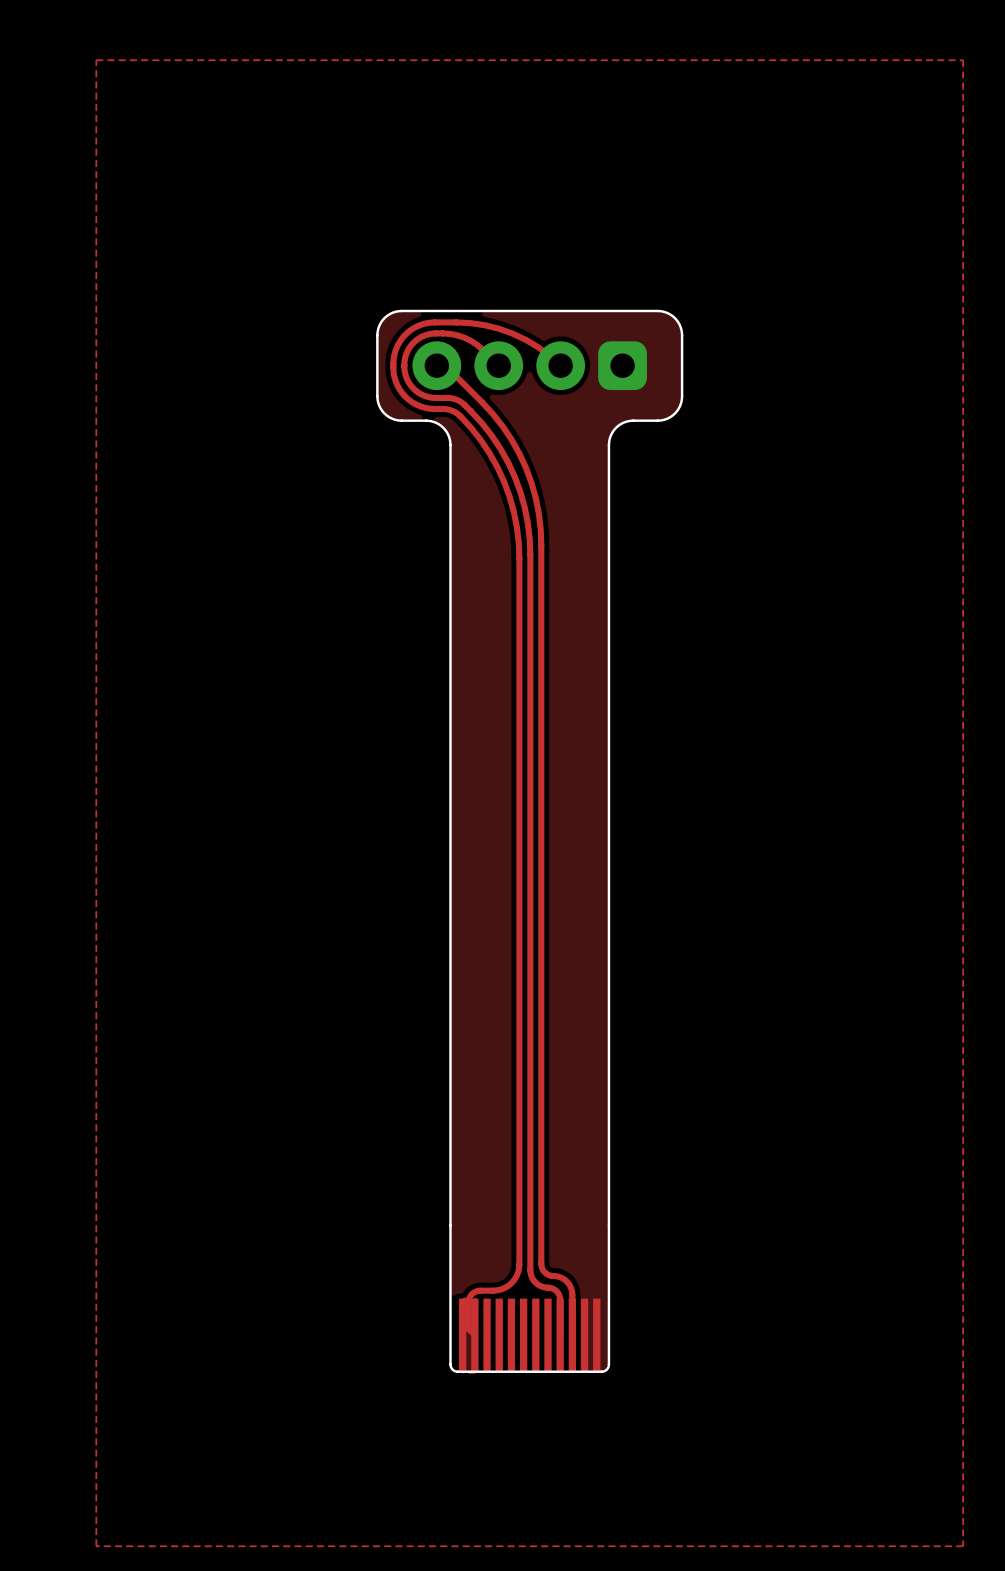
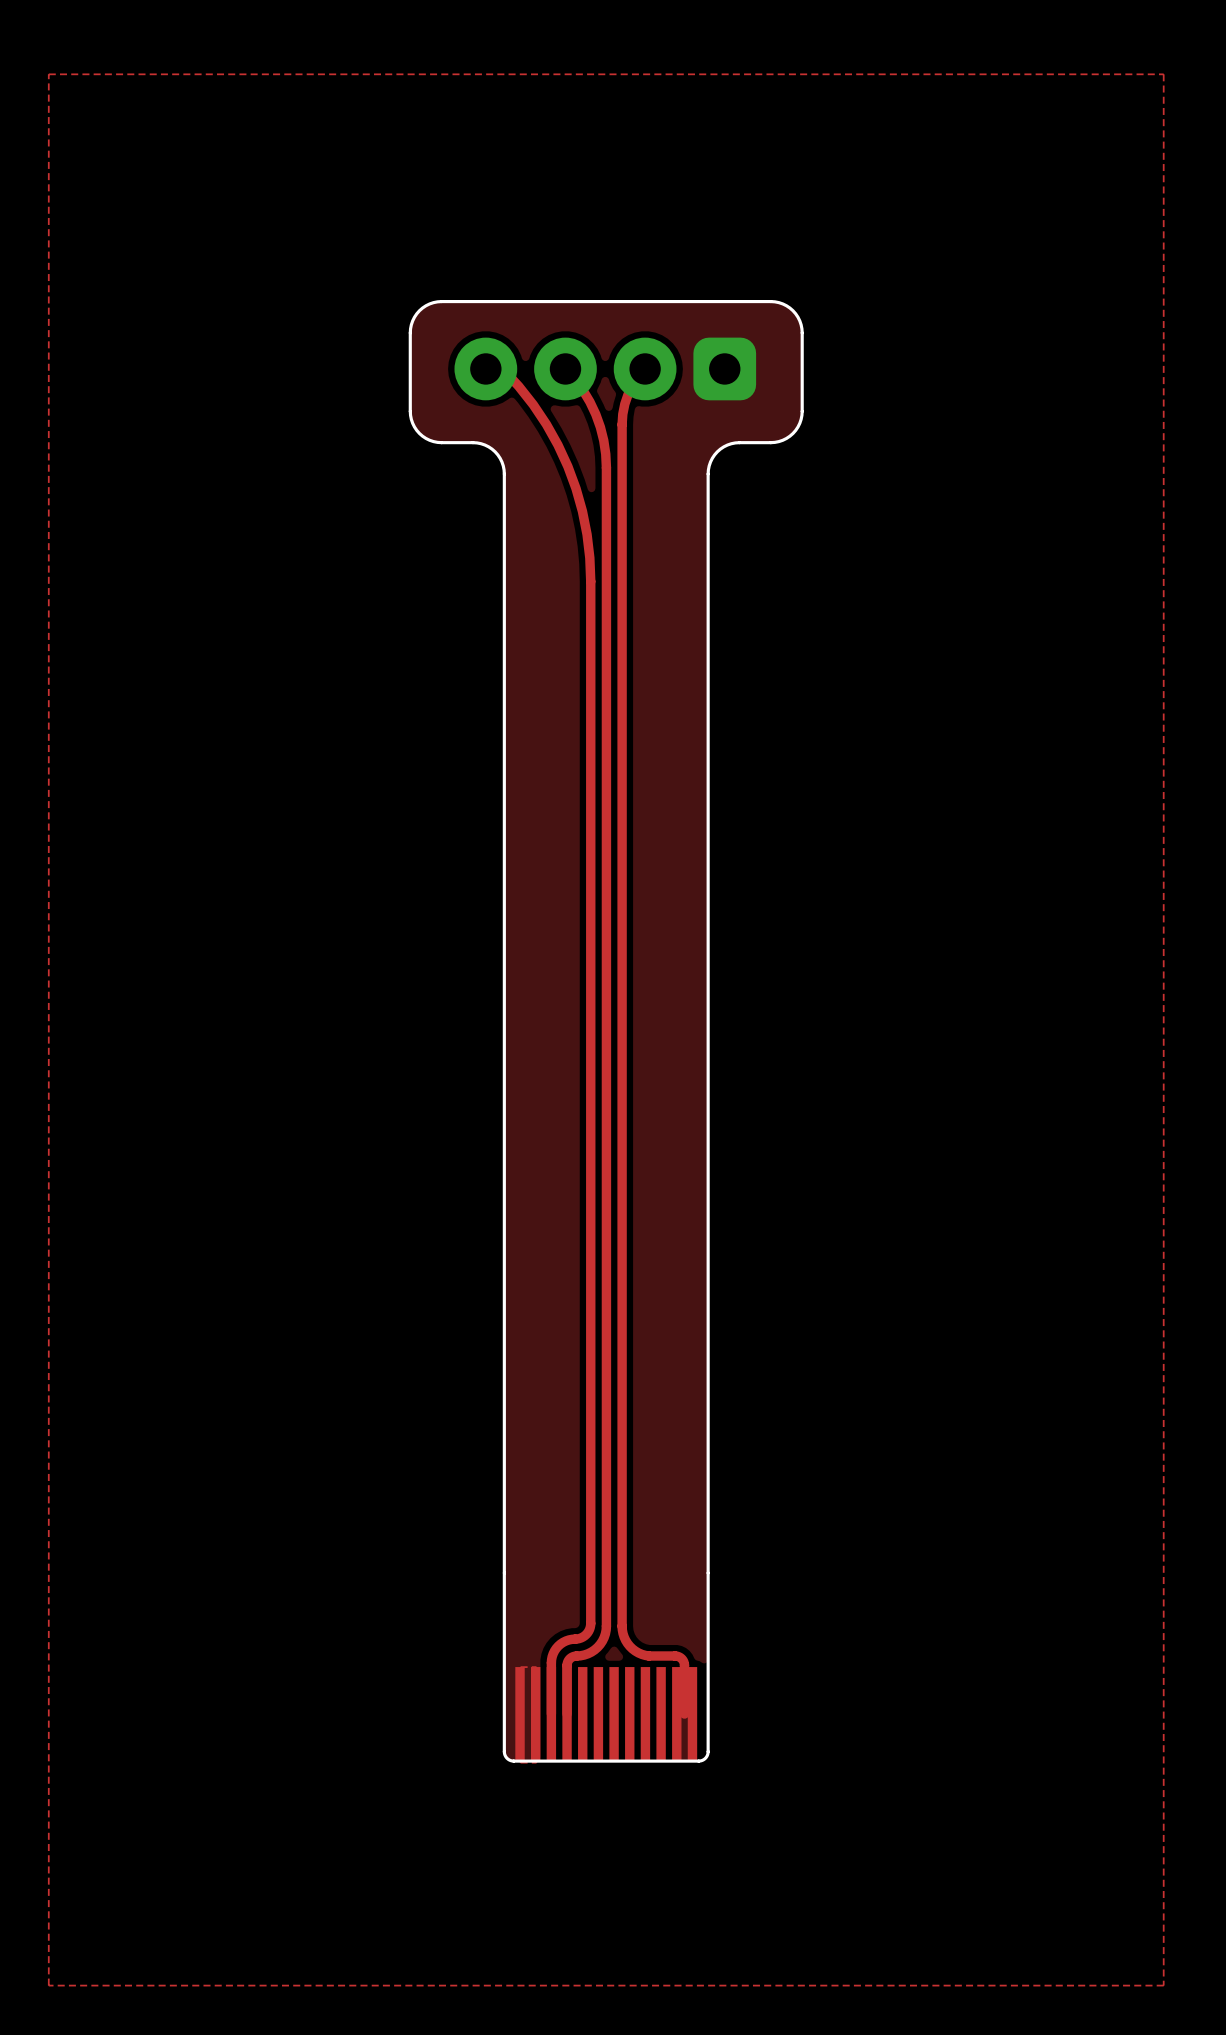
track: none -> (485, 368) (502, 368) (533, 404) (557, 445) (576, 488) (582, 511) (589, 557) (590, 1623) (588, 1631) (584, 1635) (563, 1642) (553, 1653) (551, 1662) (551, 1714)
track: none -> (565, 368) (582, 390) (595, 414) (603, 440) (606, 467) (606, 1626) (604, 1637) (597, 1647) (587, 1653) (572, 1656) (567, 1661) (567, 1714)
part: none -> (605, 368)
track: none -> (645, 368) (628, 394) (622, 424) (622, 1626) (627, 1643) (638, 1652) (648, 1656) (676, 1656) (682, 1659) (684, 1665) (684, 1714)
track: (436, 365) (445, 365) (482, 402) (502, 426) (525, 467) (538, 513) (541, 544) (541, 1263) (546, 1273) (561, 1277) (570, 1286) (572, 1294) (572, 1335) -> none
track: (498, 365) (471, 341) (457, 335) (442, 333) (428, 334) (416, 340) (407, 351) (404, 365) (407, 380) (416, 391) (428, 397) (449, 398) (459, 400) (470, 411) (491, 435) (514, 477) (527, 523) (530, 554) (530, 1270) (532, 1277) (536, 1283) (554, 1289) (559, 1295) (560, 1335) -> none
track: (560, 365) (538, 347) (512, 333) (485, 325) (456, 322) (430, 322) (412, 328) (399, 341) (393, 359) (395, 381) (405, 396) (421, 406) (454, 411) (480, 440) (504, 481) (513, 511) (518, 542) (519, 1264) (515, 1277) (506, 1287) (496, 1290) (477, 1290) (470, 1296) (468, 1329) (474, 1335) -> none
part: (529, 378) -> none
board edge: none -> (504, 569) (504, 474) (500, 458) (492, 449) (481, 443) (437, 442) (429, 440) (416, 430) (411, 419) (410, 328) (414, 317) (419, 310) (433, 302) (770, 301) (782, 303) (793, 310) (799, 320) (801, 328) (801, 419) (793, 433) (782, 440) (774, 442) (731, 443) (720, 449) (712, 458) (708, 474) (708, 569)

